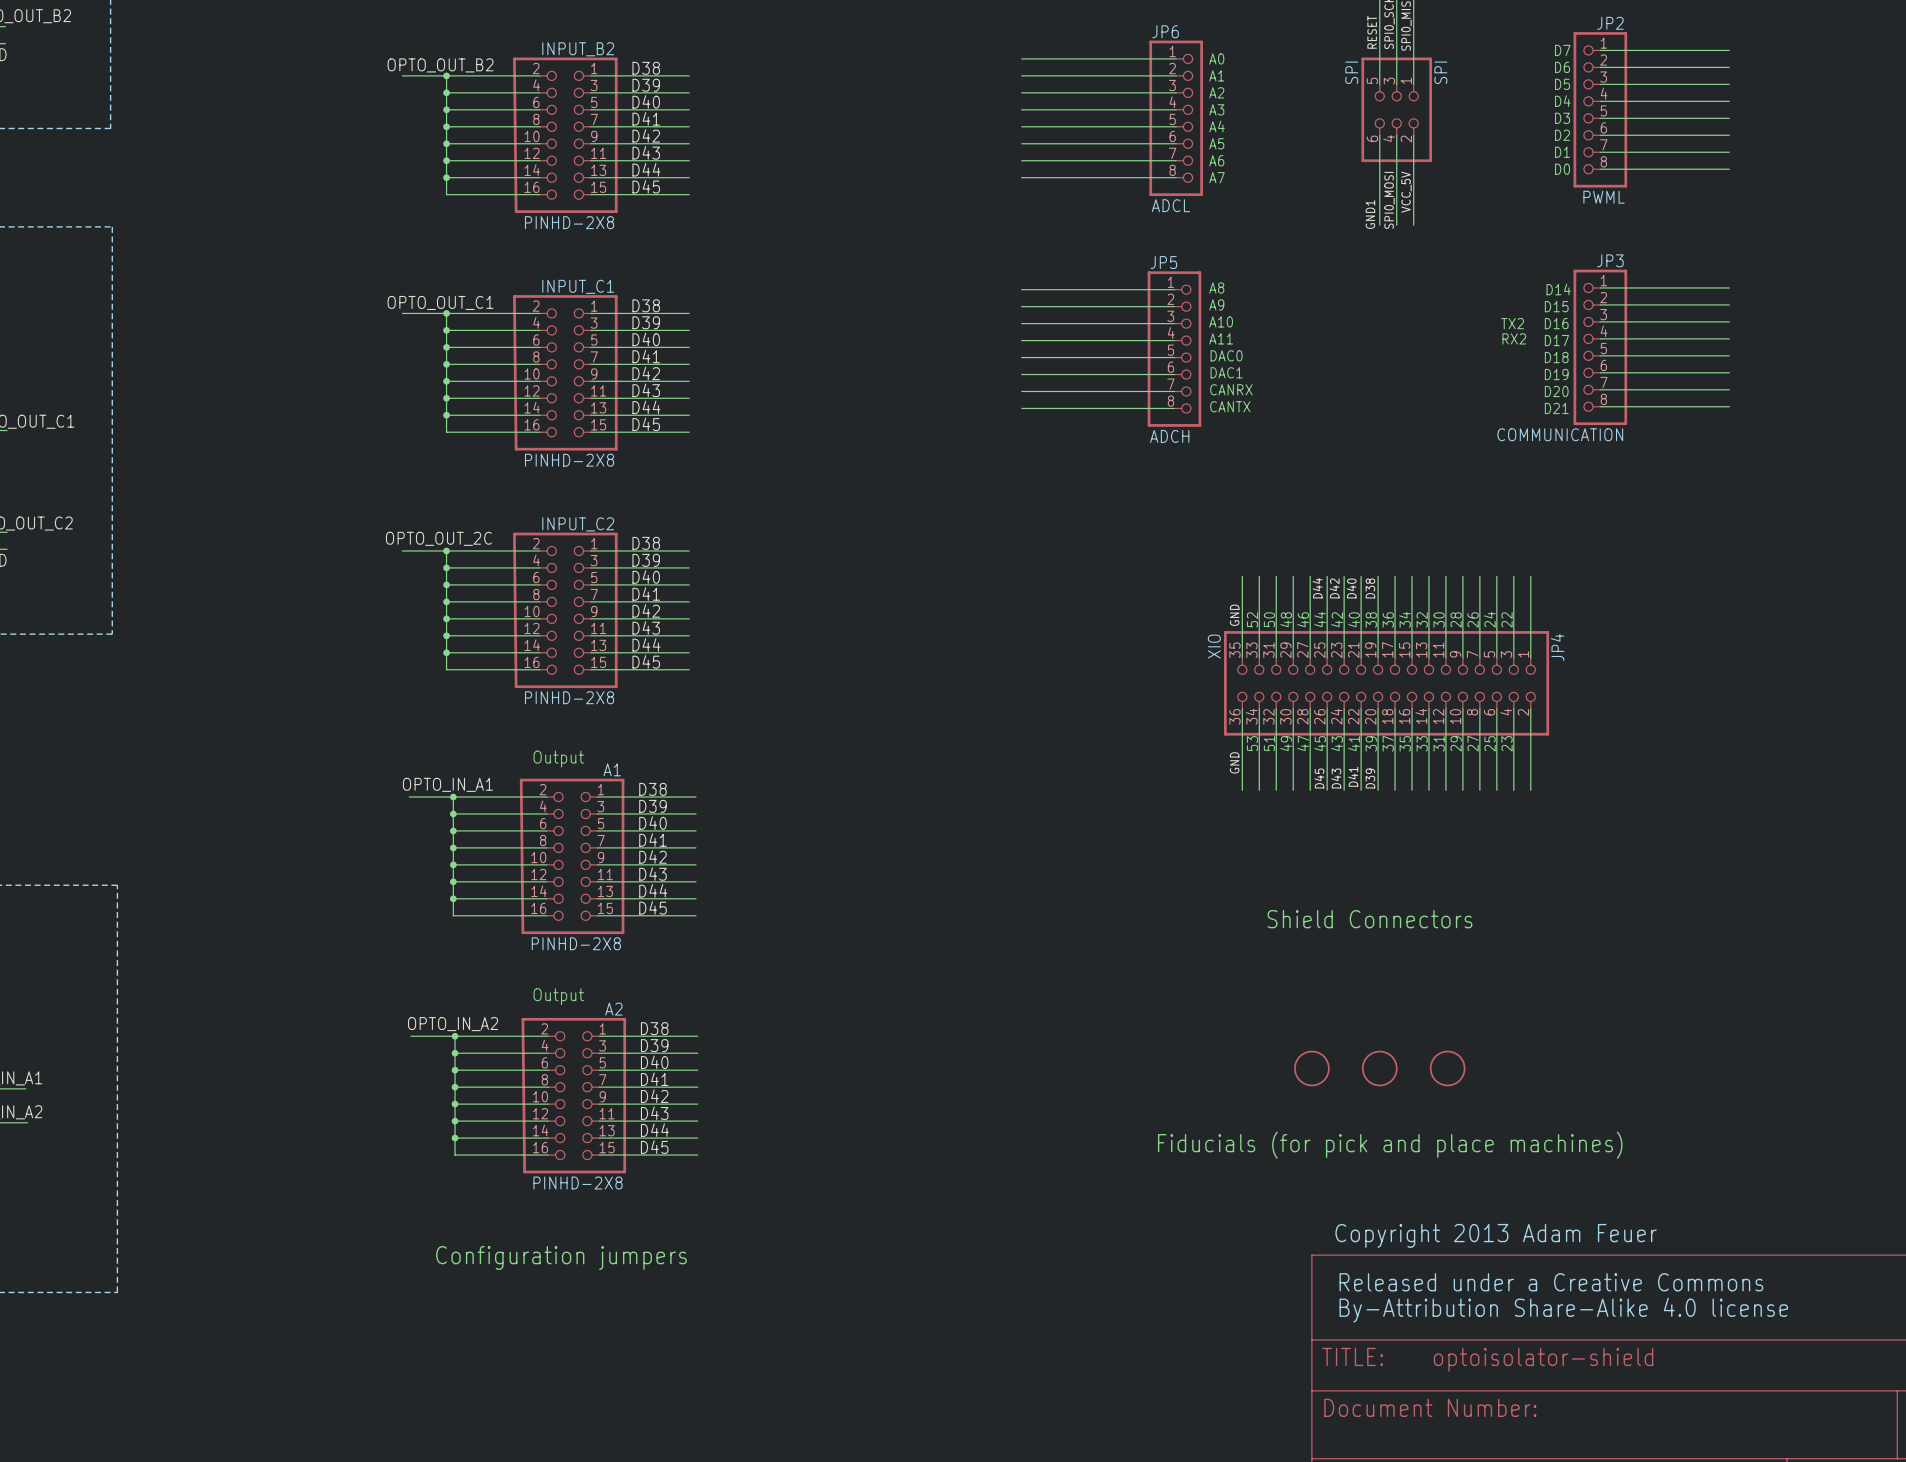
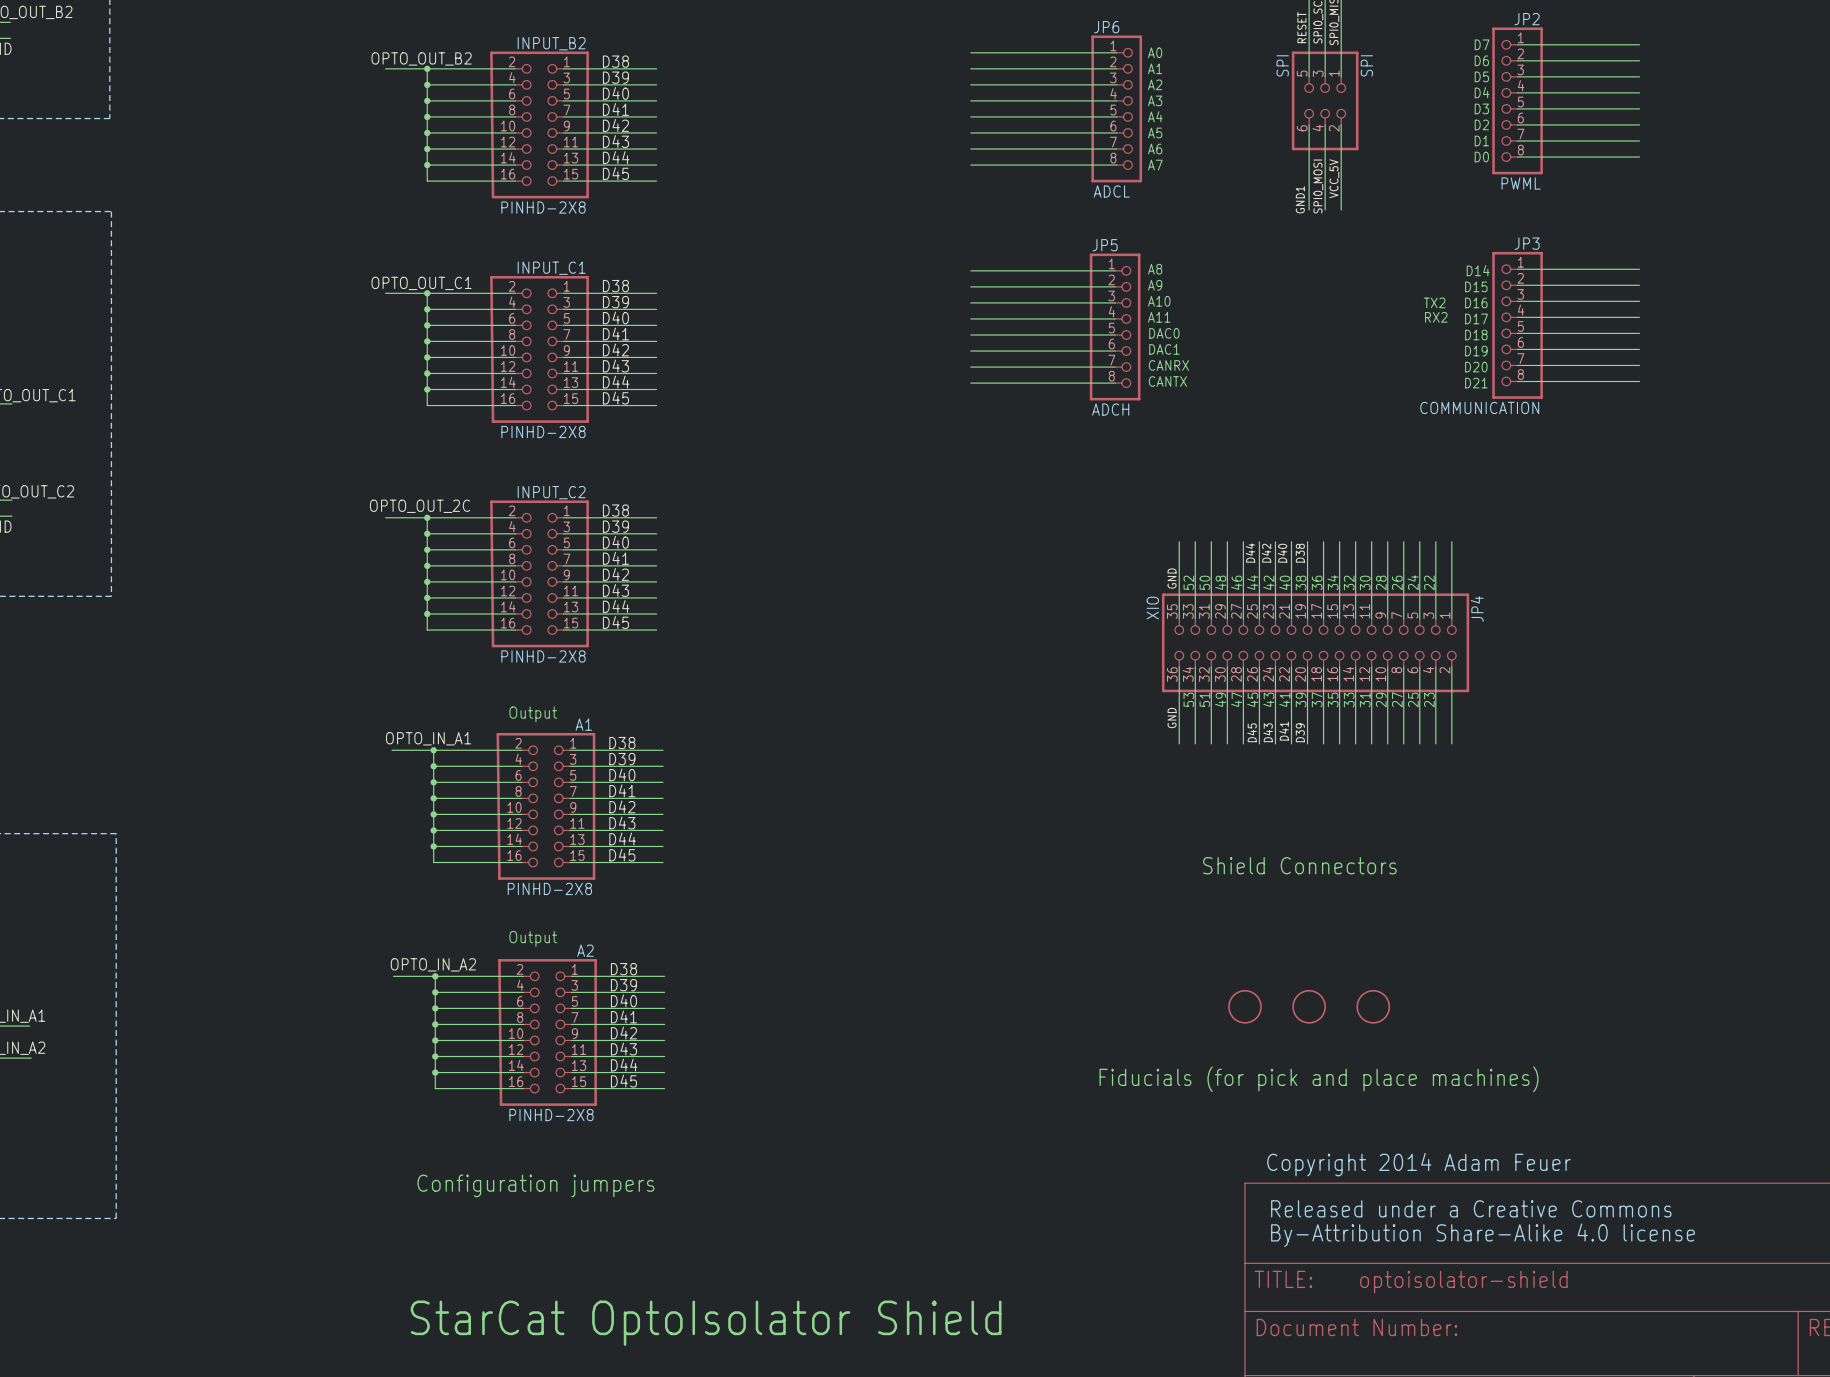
text: Copyright 2013 Adam Feuer (1496, 1235) -> Copyright 2014 Adam Feuer (1419, 1164)
text: none -> StarCat OptoIsolator Shield (706, 1323)

